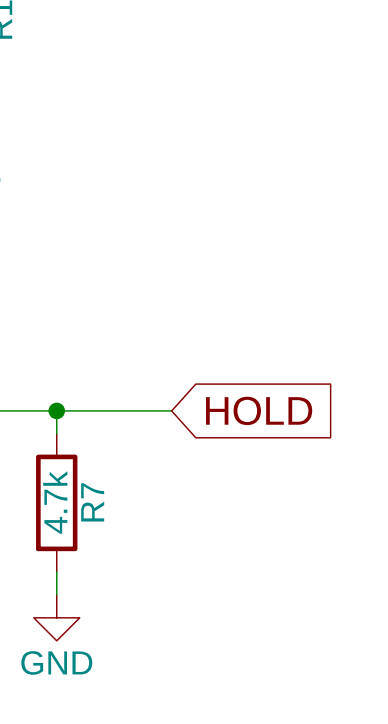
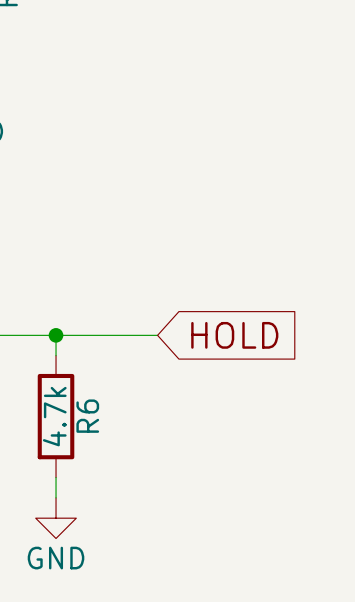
R7 name: R7 (92, 502) -> R6 (87, 416)

